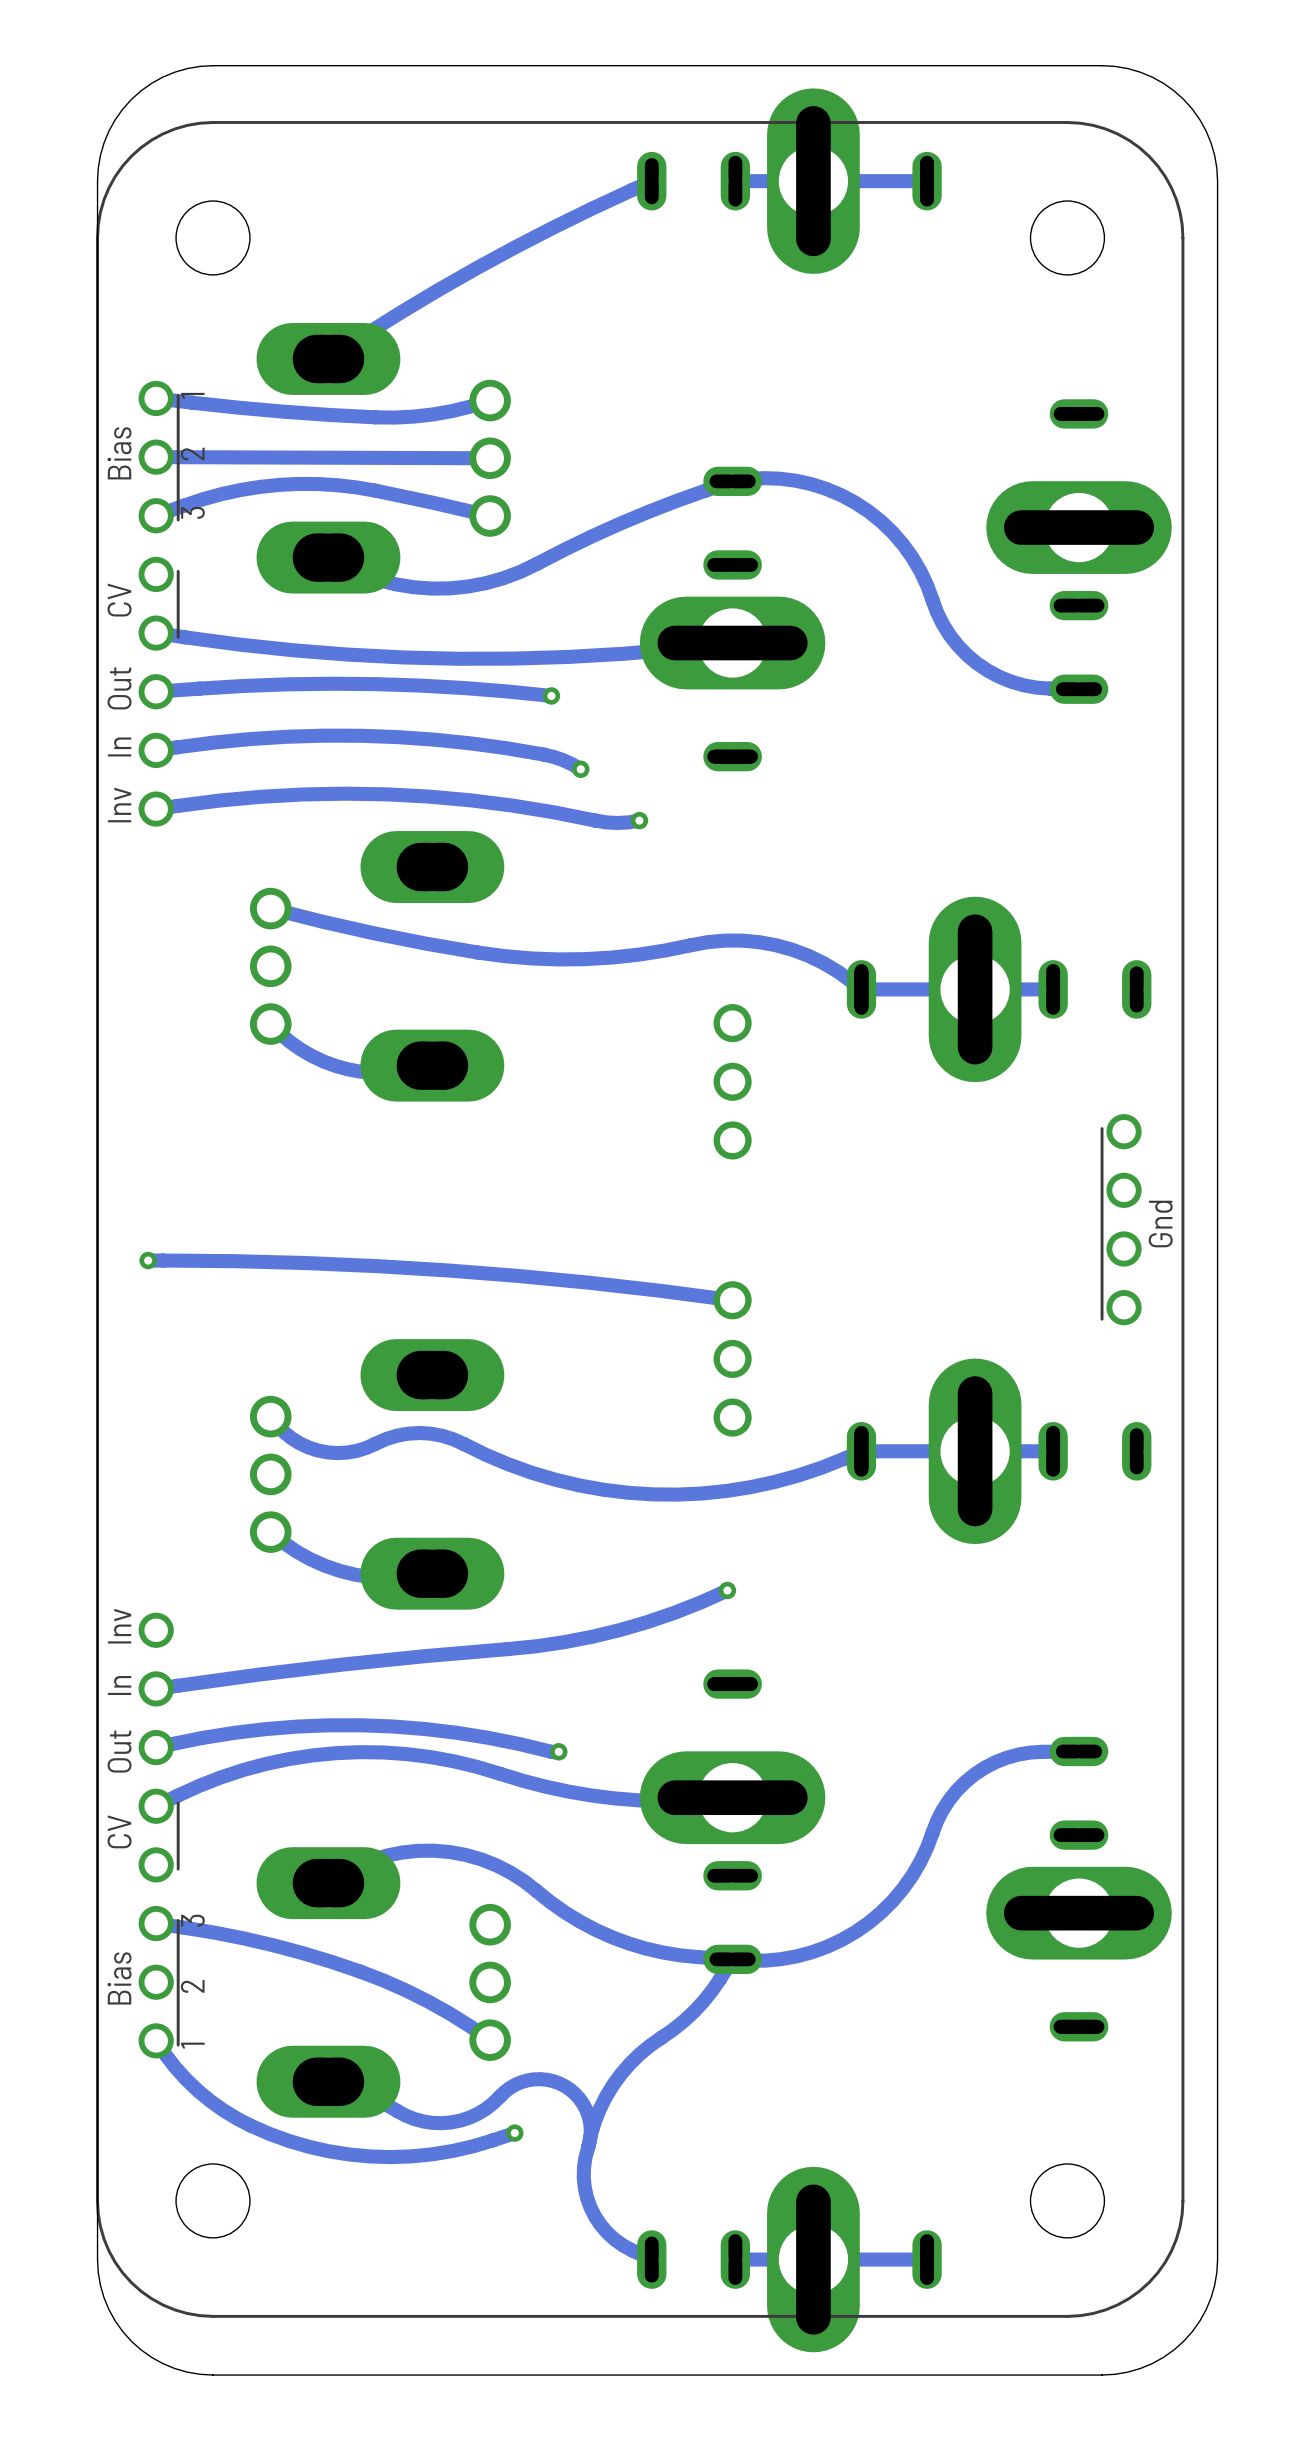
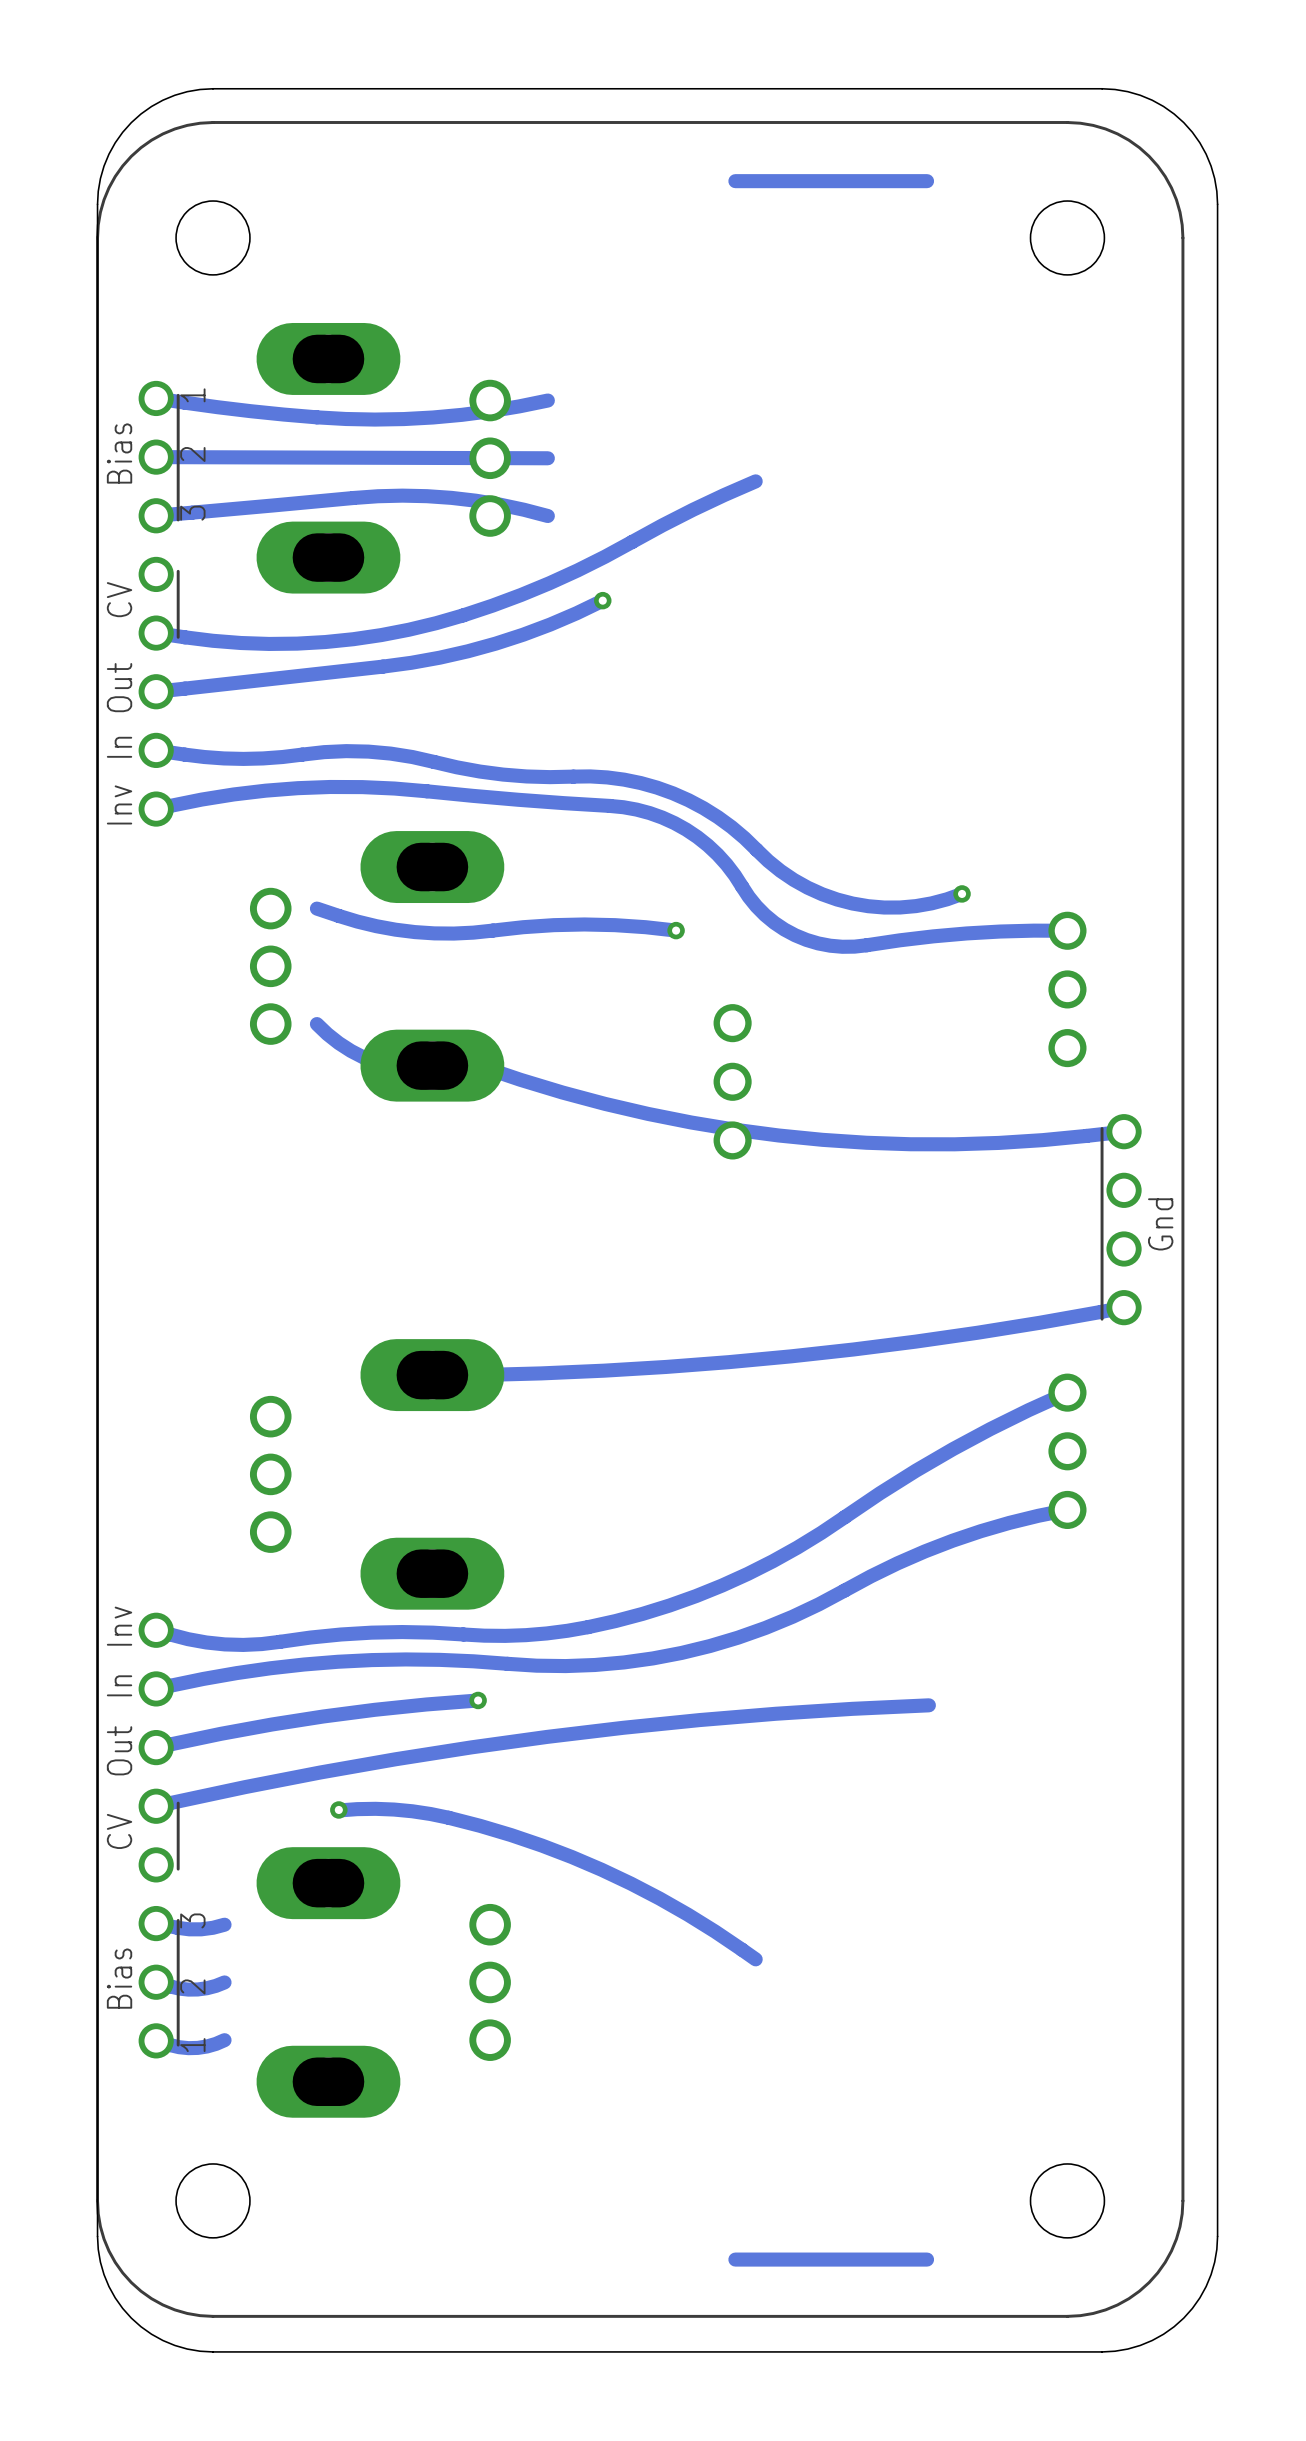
track: (651, 181) (553, 227) (476, 268) (401, 312) (328, 358) -> none
part: (789, 181) -> none
board edge: (1217, 204) (1214, 155) (1206, 131) (1192, 109) (1174, 90) (1152, 77) (1127, 68) (1102, 65) (200, 66) (174, 72) (151, 83) (122, 109) (108, 131) (100, 155) (97, 204) -> (1217, 204) (1211, 166) (1199, 142) (1183, 122) (1163, 106) (1140, 95) (1102, 88) (200, 89) (174, 95) (151, 106) (122, 132) (104, 166) (97, 204)
track: (156, 398) (283, 411) (394, 417) (452, 410) (490, 400) -> (156, 398) (283, 414) (374, 419) (461, 414) (547, 400)
track: (156, 457) (490, 458) -> (156, 457) (547, 458)
track: (156, 515) (221, 494) (259, 486) (298, 483) (356, 487) (490, 516) -> (156, 515) (353, 497) (402, 495) (475, 500) (547, 516)
part: (1079, 551) -> none
track: (328, 557) (360, 573) (395, 584) (431, 588) (468, 586) (485, 583) (520, 571) (619, 523) (732, 481) (764, 478) (796, 480) (826, 489) (855, 502) (892, 532) (920, 571) (937, 612) (950, 635) (977, 663) (999, 676) (1024, 685) (1079, 689) -> none
via: none -> (602, 600)
part: (732, 619) -> none
track: (184, 637) (348, 654) (458, 658) (623, 653) (732, 643) -> (184, 637) (240, 642) (325, 642) (381, 635) (436, 623) (492, 605) (549, 583) (605, 556) (692, 509) (755, 481)
track: (156, 691) (287, 684) (375, 684) (463, 688) (551, 695) -> (156, 691) (382, 666) (439, 657) (523, 634) (602, 600)
via: (551, 695) -> none
track: (156, 750) (214, 742) (287, 736) (397, 737) (471, 743) (544, 754) (563, 760) (580, 769) -> (156, 750) (204, 757) (243, 758) (324, 752) (368, 751) (412, 757) (456, 767) (503, 774) (550, 777) (590, 776) (624, 779) (673, 793) (703, 808) (731, 827) (780, 870) (807, 887) (837, 899) (868, 906) (900, 907) (931, 903) (962, 893)
via: (580, 769) -> none
track: (156, 809) (261, 796) (345, 793) (387, 794) (429, 796) (512, 805) (606, 822) (639, 820) -> (156, 809) (233, 794) (330, 786) (394, 788) (623, 807) (662, 817) (697, 837) (726, 864) (748, 896) (764, 914) (795, 935) (818, 943) (854, 946) (966, 933) (1067, 930)
via: (639, 820) -> none
via: none -> (962, 893)
track: (270, 908) (373, 933) (504, 956) (558, 959) (611, 957) (664, 950) (707, 942) (741, 940) (775, 945) (808, 955) (838, 971) (861, 989) (1053, 989) -> none
track: none -> (316, 908) (376, 926) (434, 933) (473, 932) (523, 927) (584, 924) (676, 930)
via: none -> (676, 930)
part: (999, 989) -> none
part: none -> (1067, 989)
track: (270, 1024) (289, 1041) (311, 1055) (347, 1069) (386, 1073) (432, 1065) -> none
track: none -> (316, 1024) (350, 1050) (391, 1067) (434, 1071) (478, 1065) (605, 1103) (734, 1129) (822, 1139) (910, 1144) (998, 1142) (1124, 1131)
track: (148, 1260) (305, 1263) (448, 1270) (590, 1282) (732, 1300) -> none
via: (148, 1260) -> none
track: none -> (1124, 1307) (977, 1332) (791, 1356) (666, 1366) (478, 1375)
part: (732, 1358) -> none
track: none -> (1067, 1392) (952, 1449) (880, 1493) (821, 1532) (772, 1561) (696, 1596) (615, 1621) (567, 1630) (526, 1635) (371, 1632) (243, 1644) (206, 1642) (156, 1630)
track: (270, 1416) (291, 1437) (317, 1450) (347, 1452) (366, 1447) (396, 1435) (430, 1433) (453, 1439) (508, 1464) (555, 1479) (603, 1489) (652, 1494) (701, 1493) (750, 1487) (798, 1475) (861, 1451) (1053, 1451) -> none
part: (999, 1451) -> none
part: none -> (1067, 1451)
track: (270, 1532) (310, 1559) (340, 1570) (387, 1578) (432, 1573) -> none
track: (727, 1590) (647, 1621) (564, 1642) (342, 1664) (156, 1688) -> (1067, 1509) (1009, 1522) (952, 1540) (897, 1563) (792, 1616) (738, 1637) (681, 1652) (624, 1662) (565, 1666) (439, 1659) (337, 1661) (236, 1673) (156, 1688)
via: (727, 1590) -> none
track: (170, 1744) (265, 1729) (361, 1725) (457, 1732) (558, 1751) -> (170, 1744) (323, 1716) (478, 1700)
via position: (558, 1751) -> (478, 1700)
track: (1079, 1751) (1042, 1751) (1018, 1754) (995, 1762) (974, 1774) (956, 1790) (942, 1810) (920, 1862) (902, 1888) (881, 1912) (855, 1931) (827, 1946) (796, 1956) (764, 1960) (732, 1959) -> none
track: (732, 1797) (662, 1801) (615, 1798) (545, 1786) (477, 1766) (431, 1757) (360, 1752) (313, 1755) (266, 1763) (221, 1777) (156, 1806) -> (928, 1705) (775, 1713) (547, 1736) (320, 1772) (156, 1806)
track: none -> (338, 1809) (394, 1809) (430, 1814) (480, 1825) (541, 1845) (601, 1869) (659, 1898) (715, 1931) (755, 1959)
via: none -> (338, 1809)
part: (732, 1821) -> none
track: (328, 1883) (341, 1874) (370, 1860) (401, 1852) (434, 1850) (465, 1854) (481, 1859) (510, 1872) (565, 1912) (612, 1937) (662, 1952) (732, 1959) -> none
part: (1079, 1889) -> none
track: (156, 1923) (214, 1932) (273, 1945) (360, 1971) (427, 2001) (490, 2040) -> (156, 1923) (189, 1929) (213, 1927) (224, 1924)
track: (732, 1959) (712, 1990) (693, 2011) (639, 2054) (621, 2073) (599, 2108) (588, 2147) -> none
track: none -> (156, 1982) (188, 1989) (206, 1988) (224, 1982)
track: (156, 2040) (185, 2078) (222, 2109) (269, 2134) (309, 2146) (349, 2154) (411, 2156) (452, 2150) (514, 2133) -> (156, 2040) (188, 2048) (207, 2046) (224, 2040)
track: (328, 2081) (364, 2093) (414, 2119) (442, 2123) (460, 2120) (478, 2113) (509, 2087) (521, 2082) (533, 2079) (553, 2081) (570, 2089) (579, 2098) (586, 2109) (590, 2128) (588, 2147) -> none
via: (514, 2133) -> none
track: (588, 2147) (583, 2177) (587, 2197) (595, 2216) (614, 2239) (651, 2259) -> none
board edge: (1217, 2236) (1214, 2285) (1206, 2309) (1192, 2331) (1174, 2349) (1152, 2363) (1127, 2372) (1102, 2375) (200, 2374) (174, 2368) (151, 2357) (122, 2331) (108, 2309) (100, 2285) (97, 2236) -> (1217, 2236) (1211, 2274) (1199, 2297) (1183, 2318) (1163, 2334) (1140, 2345) (1102, 2351) (200, 2351) (174, 2345) (151, 2334) (122, 2308) (104, 2274) (97, 2236)
part: (789, 2259) -> none

